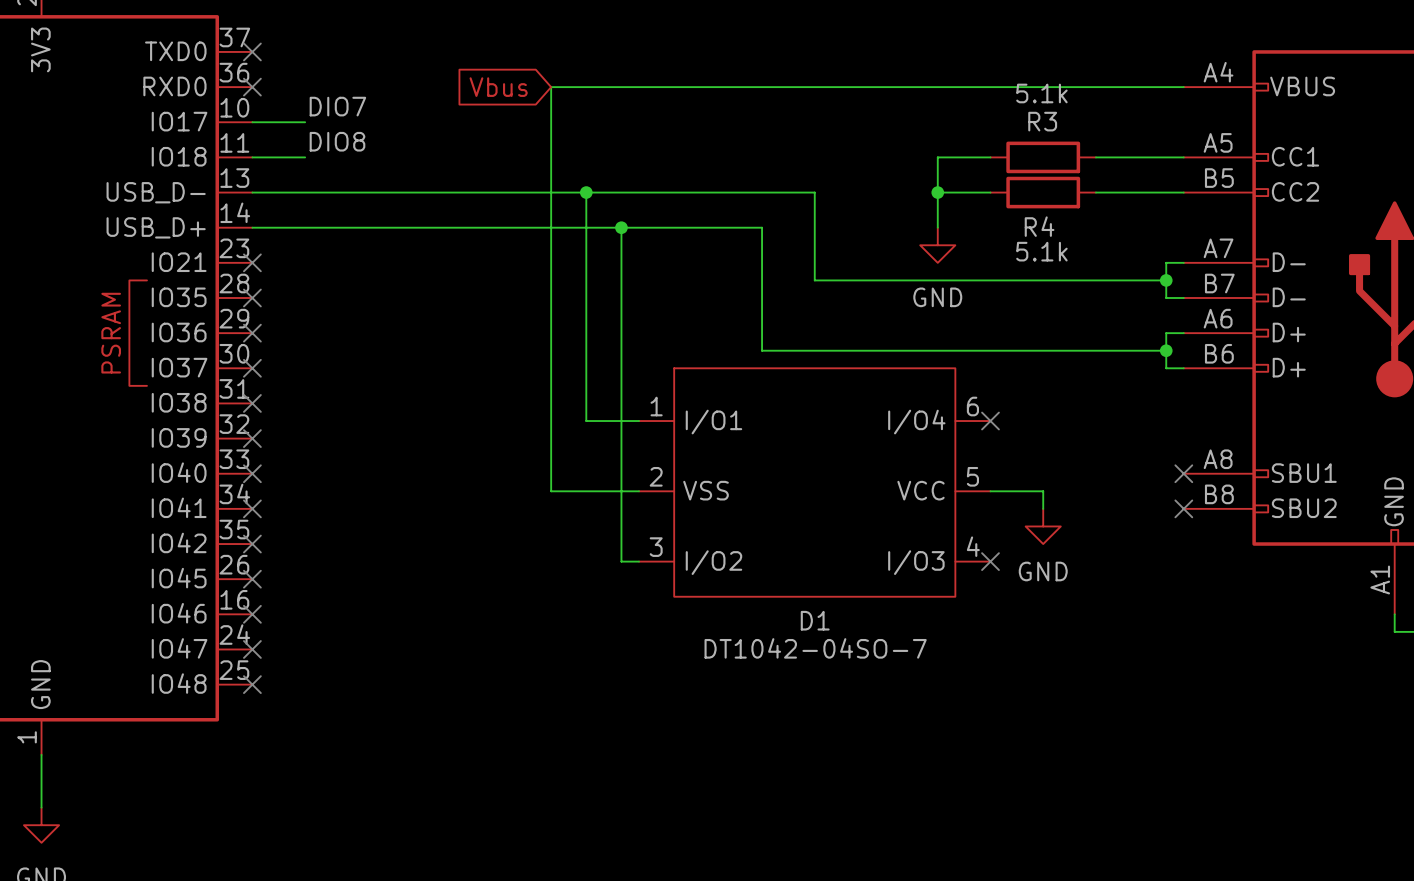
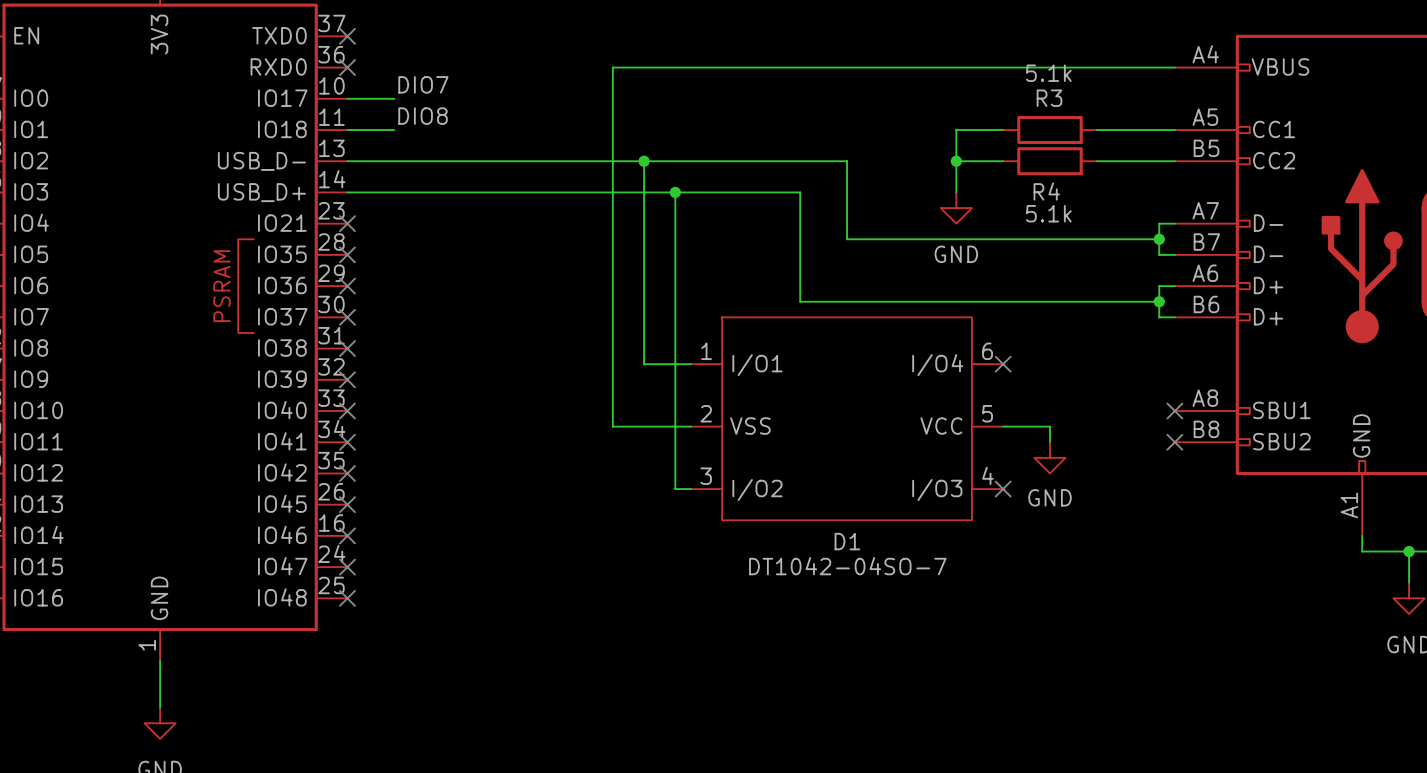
global label: Vbus (498, 87) -> none

